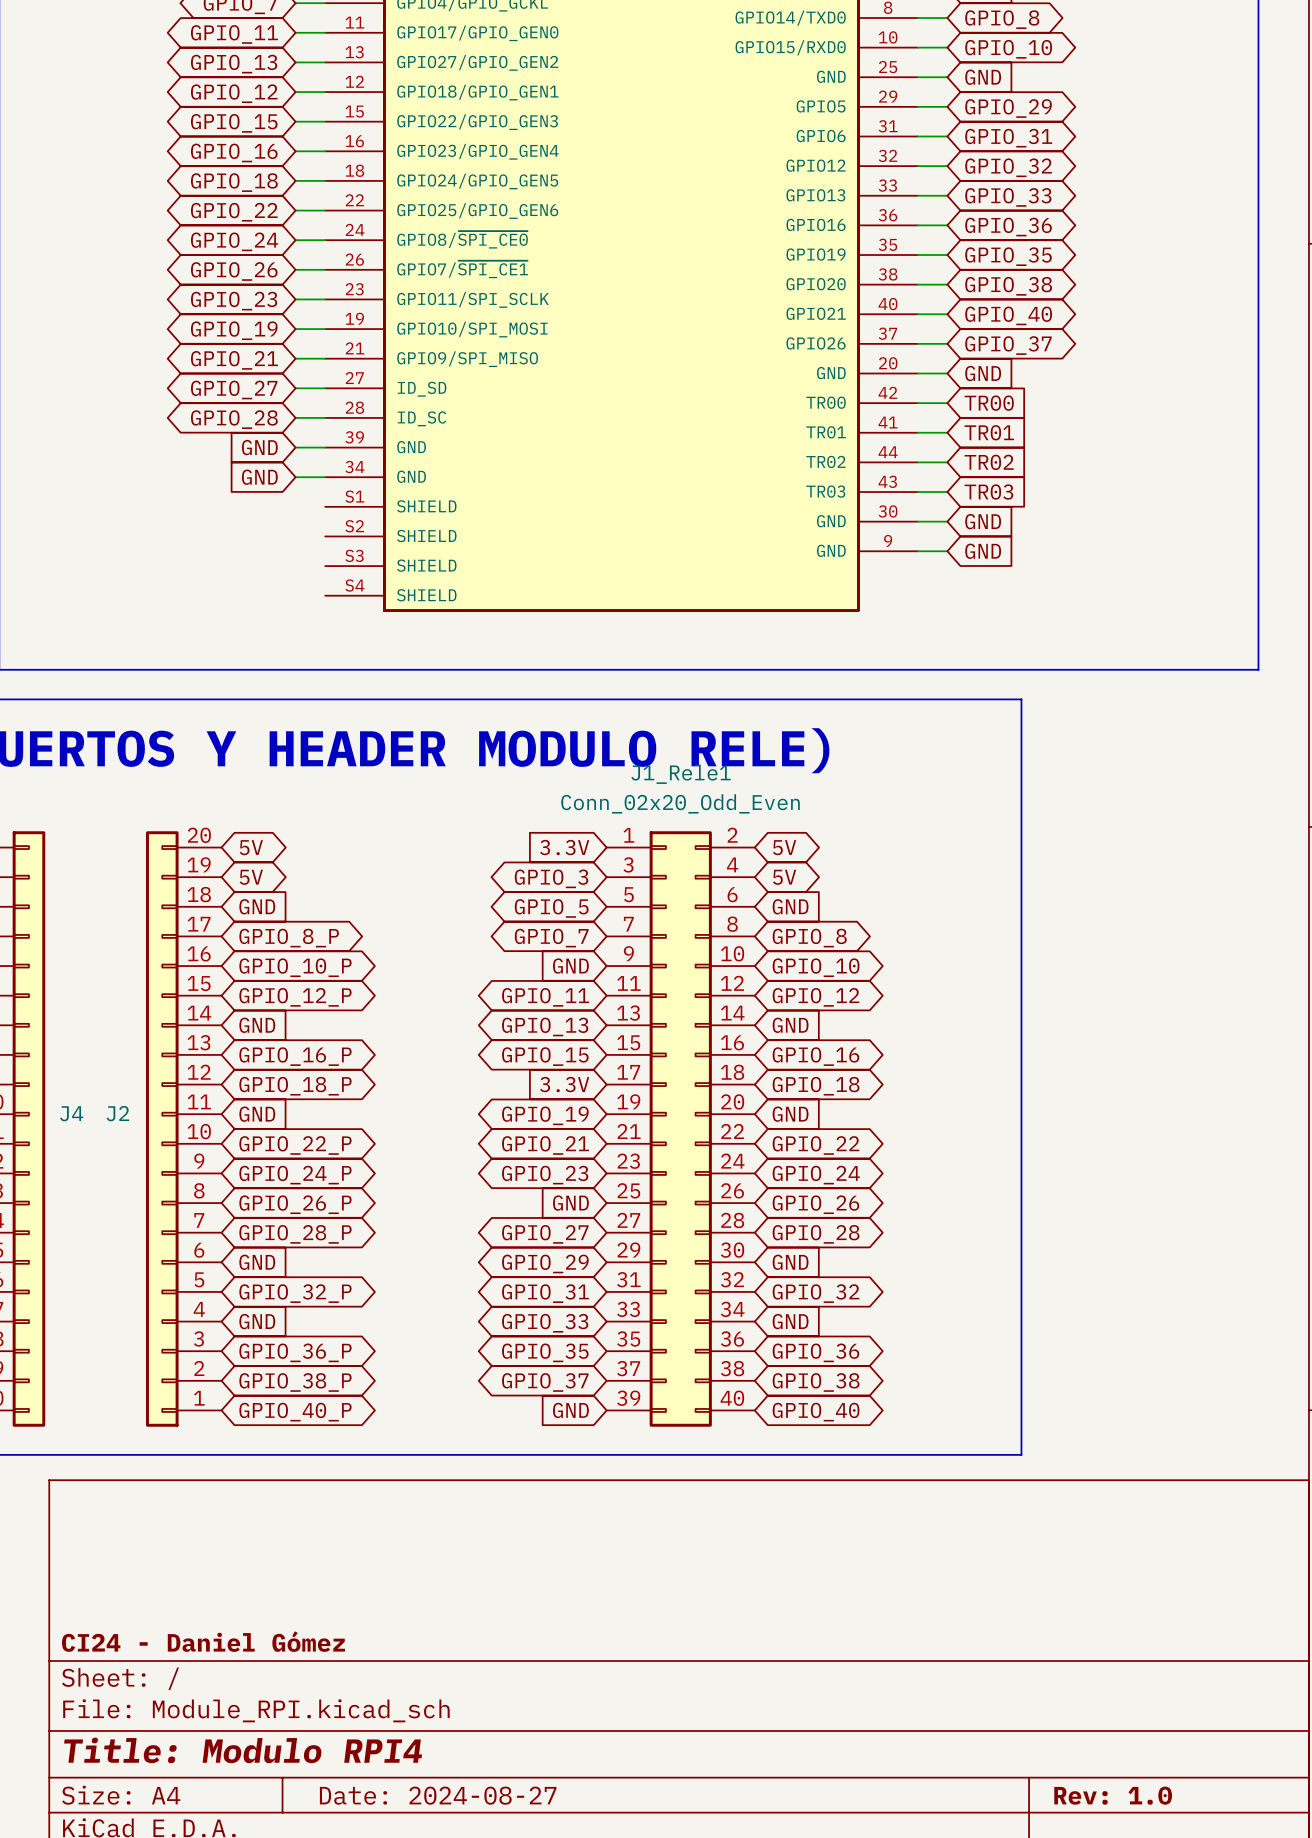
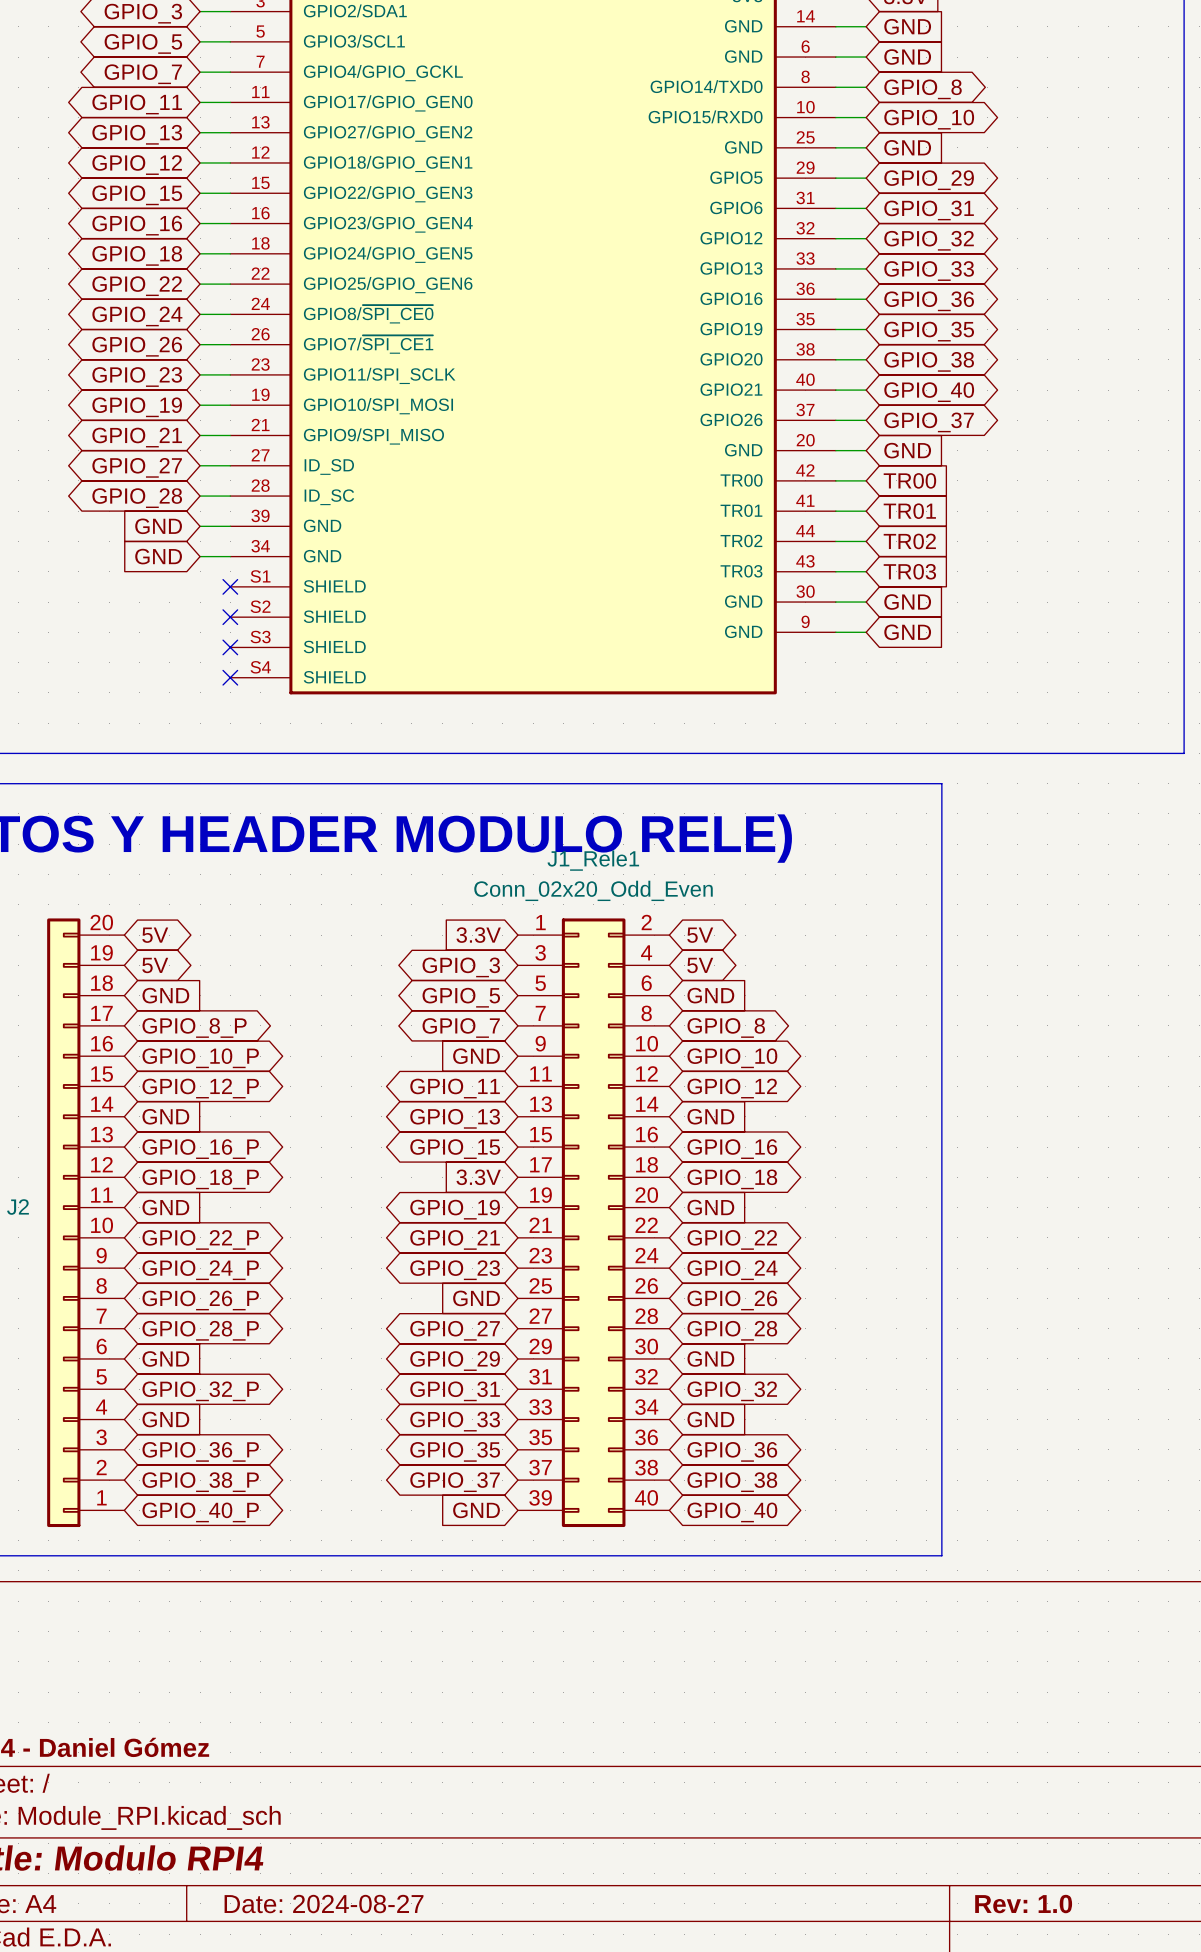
no-connect mark: none -> (230, 586)
no-connect mark: none -> (230, 617)
no-connect mark: none -> (230, 647)
no-connect mark: none -> (230, 677)

